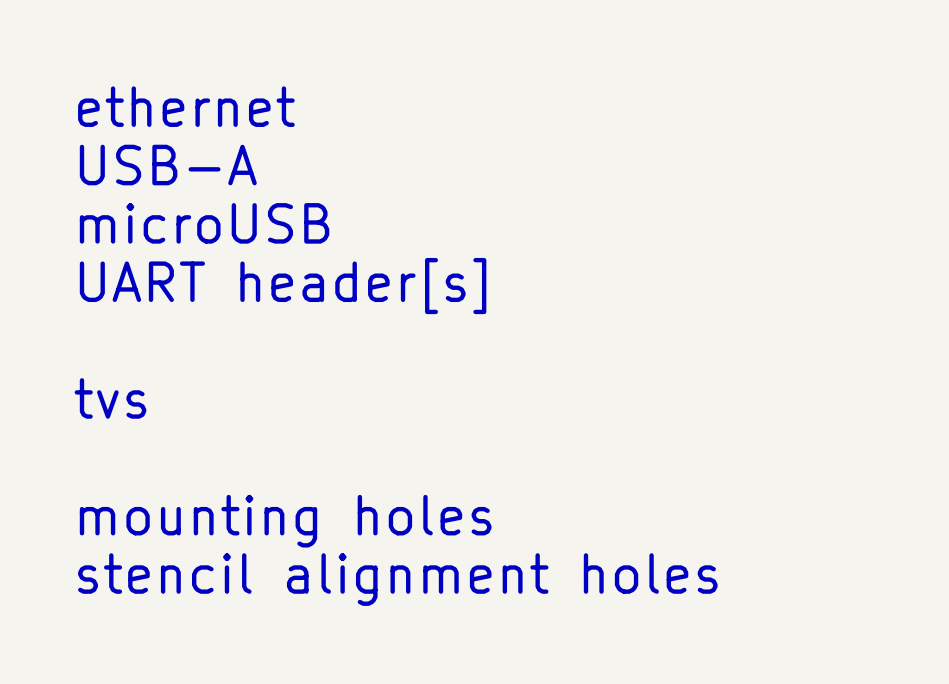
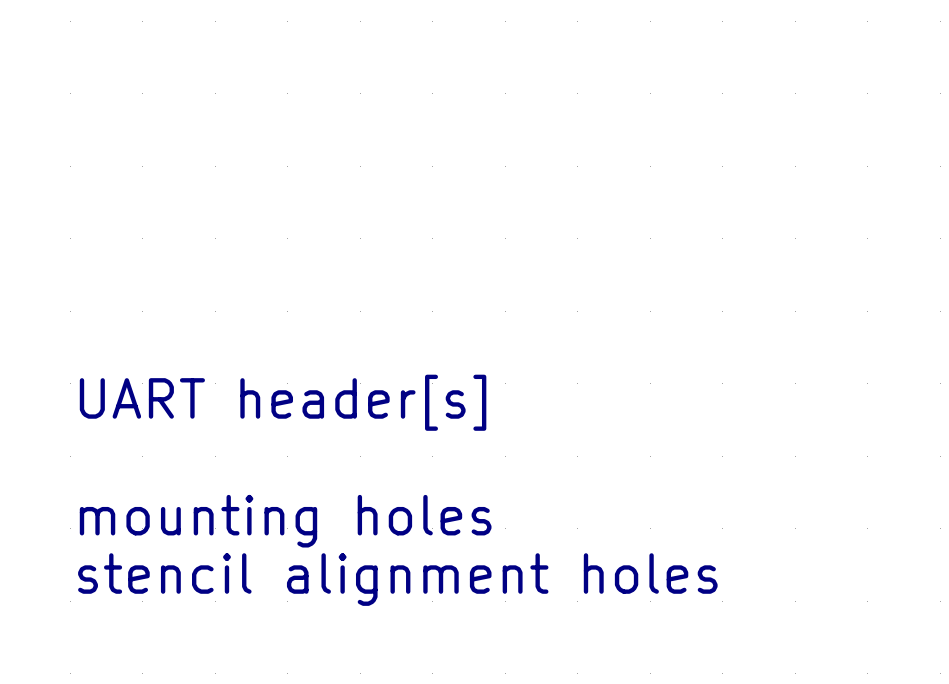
text: ethernet (186, 106) -> none
text: USB-A (168, 165) -> none
text: microUSB (204, 223) -> none
text: UART header[s] (283, 286) -> none
text: tvs (110, 398) -> UART header[s] (283, 402)

